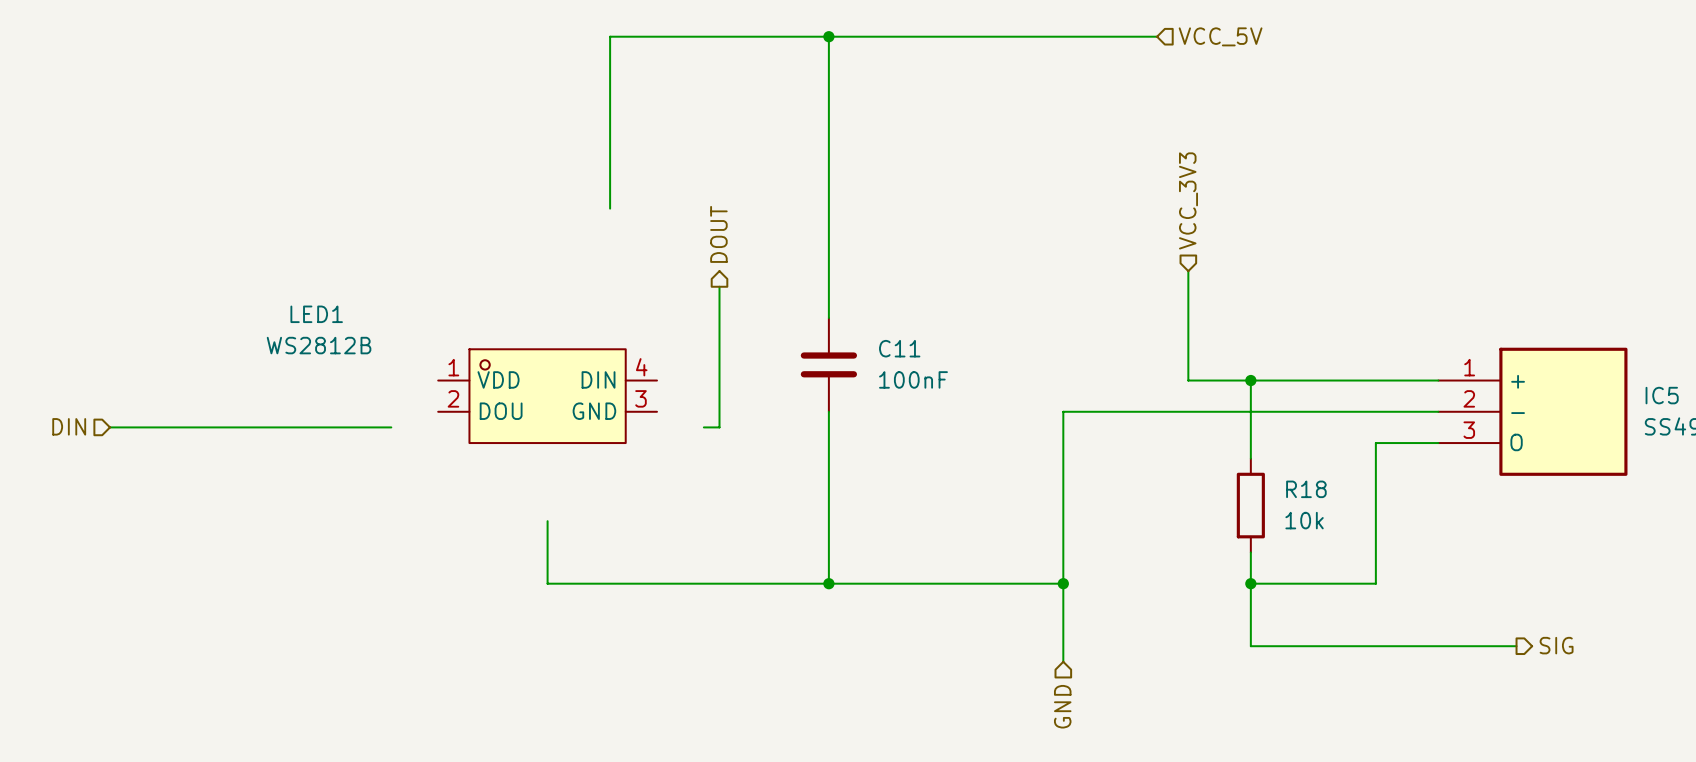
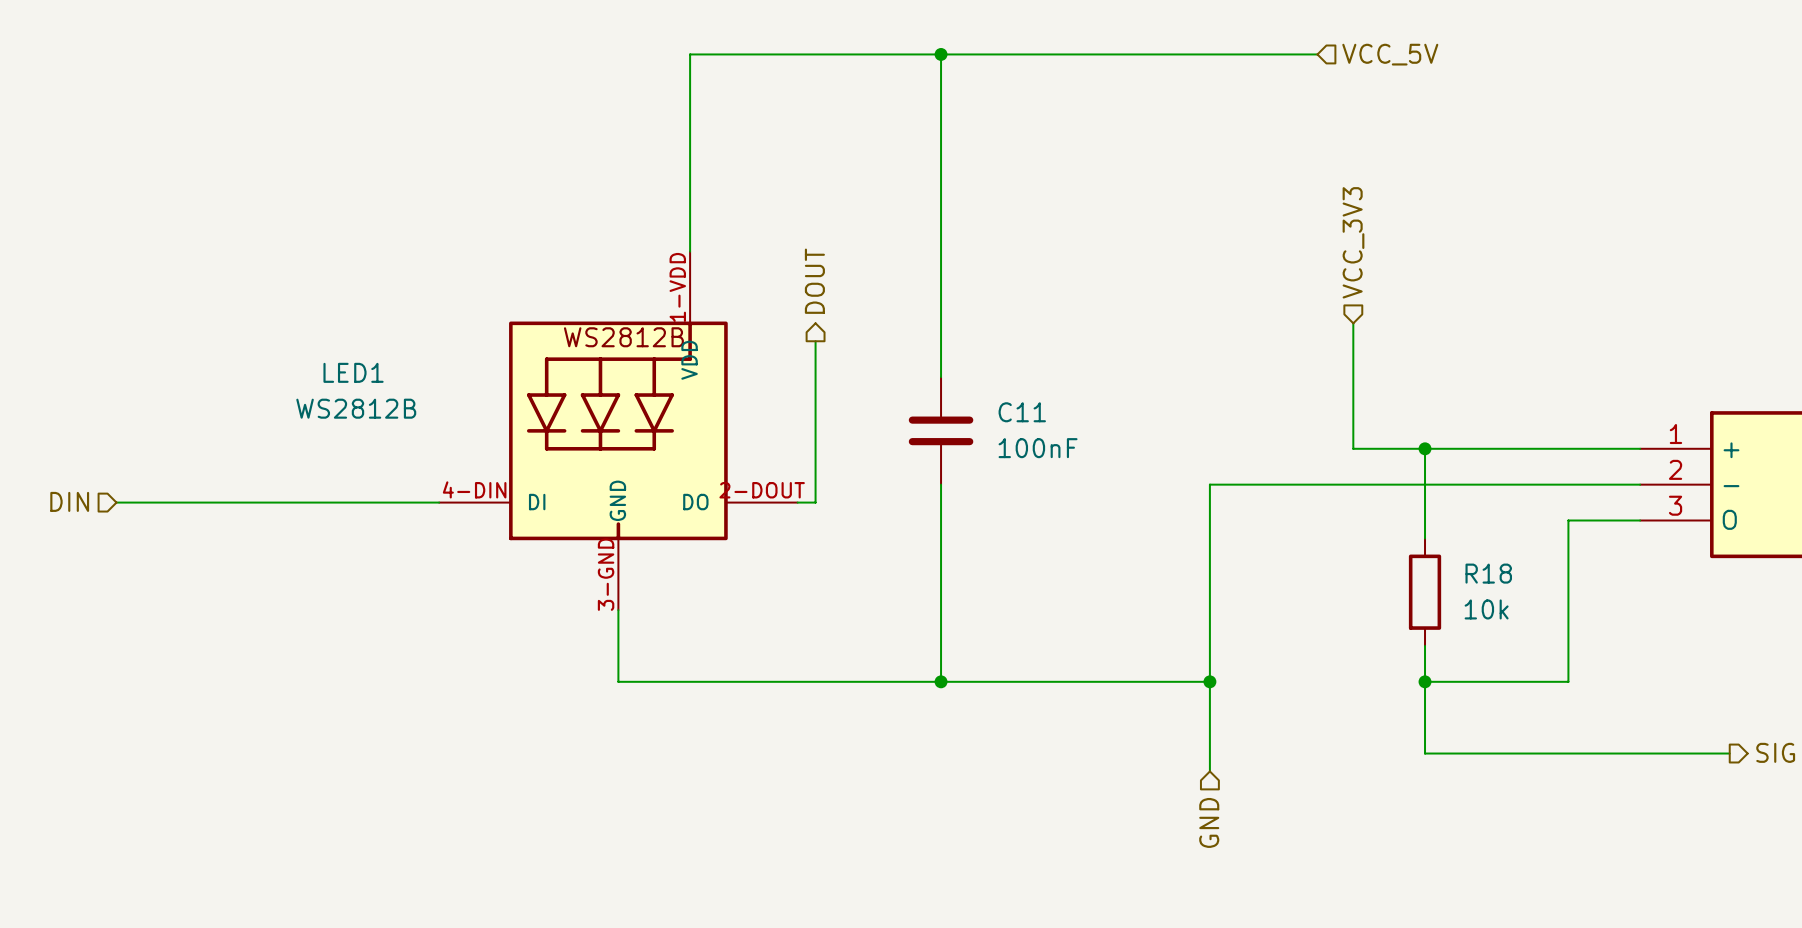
LED1 symbol: [438, 349, 657, 444] -> [439, 251, 798, 611]

